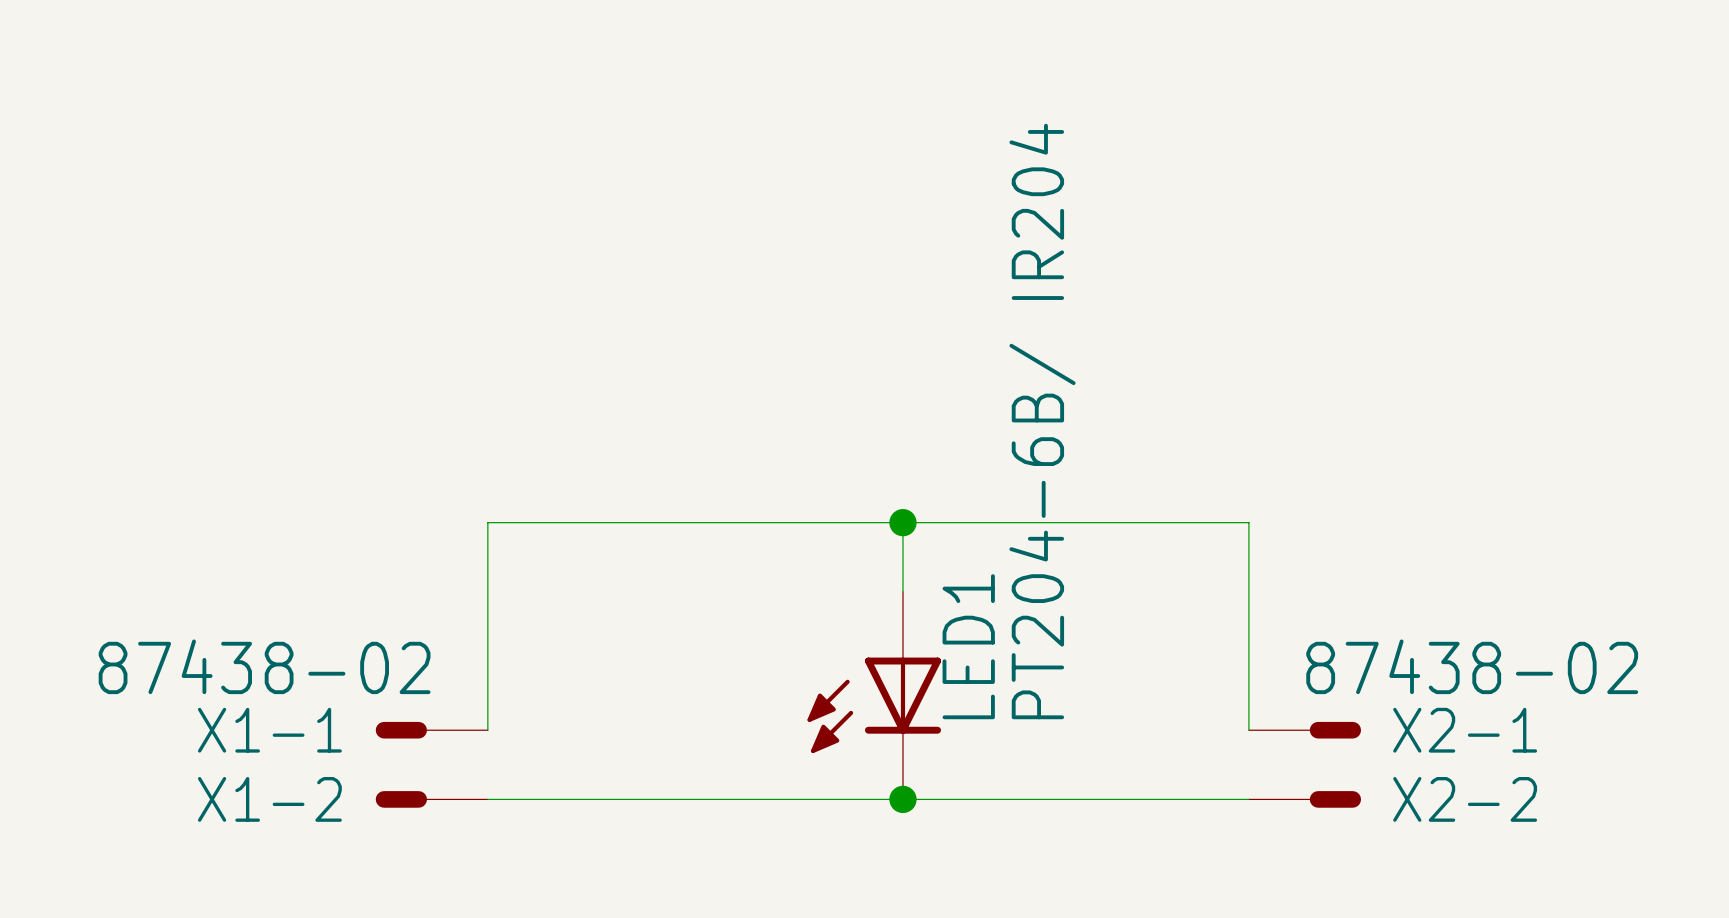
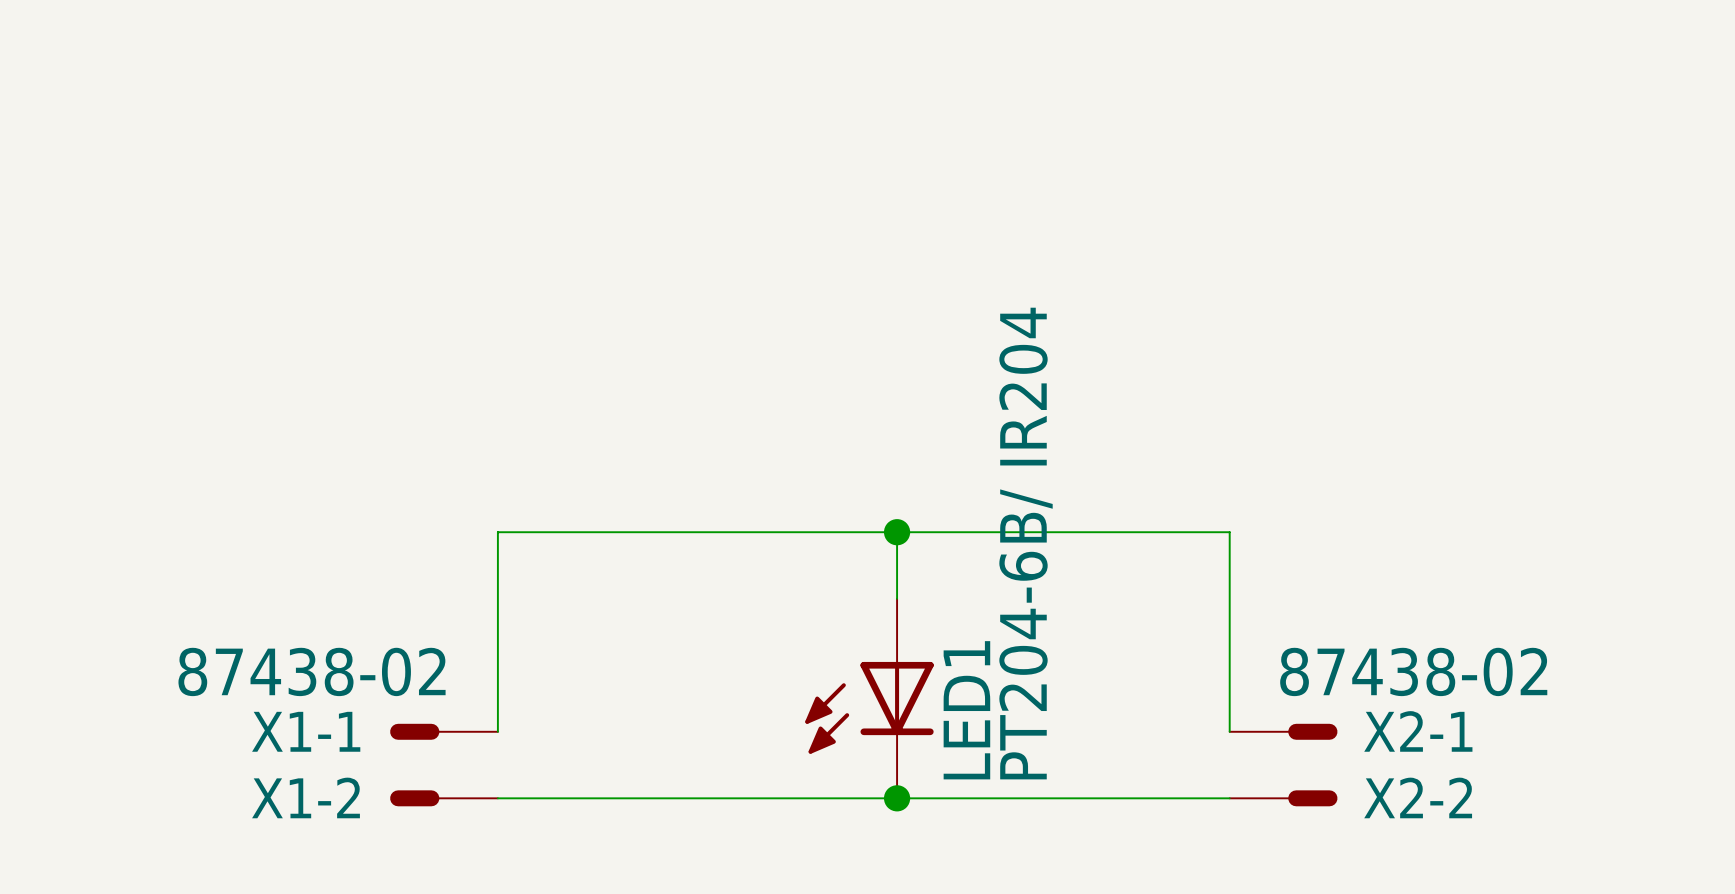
LED1 value position: PT204-6B/ IR204 (1042, 421) -> PT204-6B/ IR204 (1026, 543)
LED1 name position: LED1 (968, 646) -> LED1 (966, 710)

